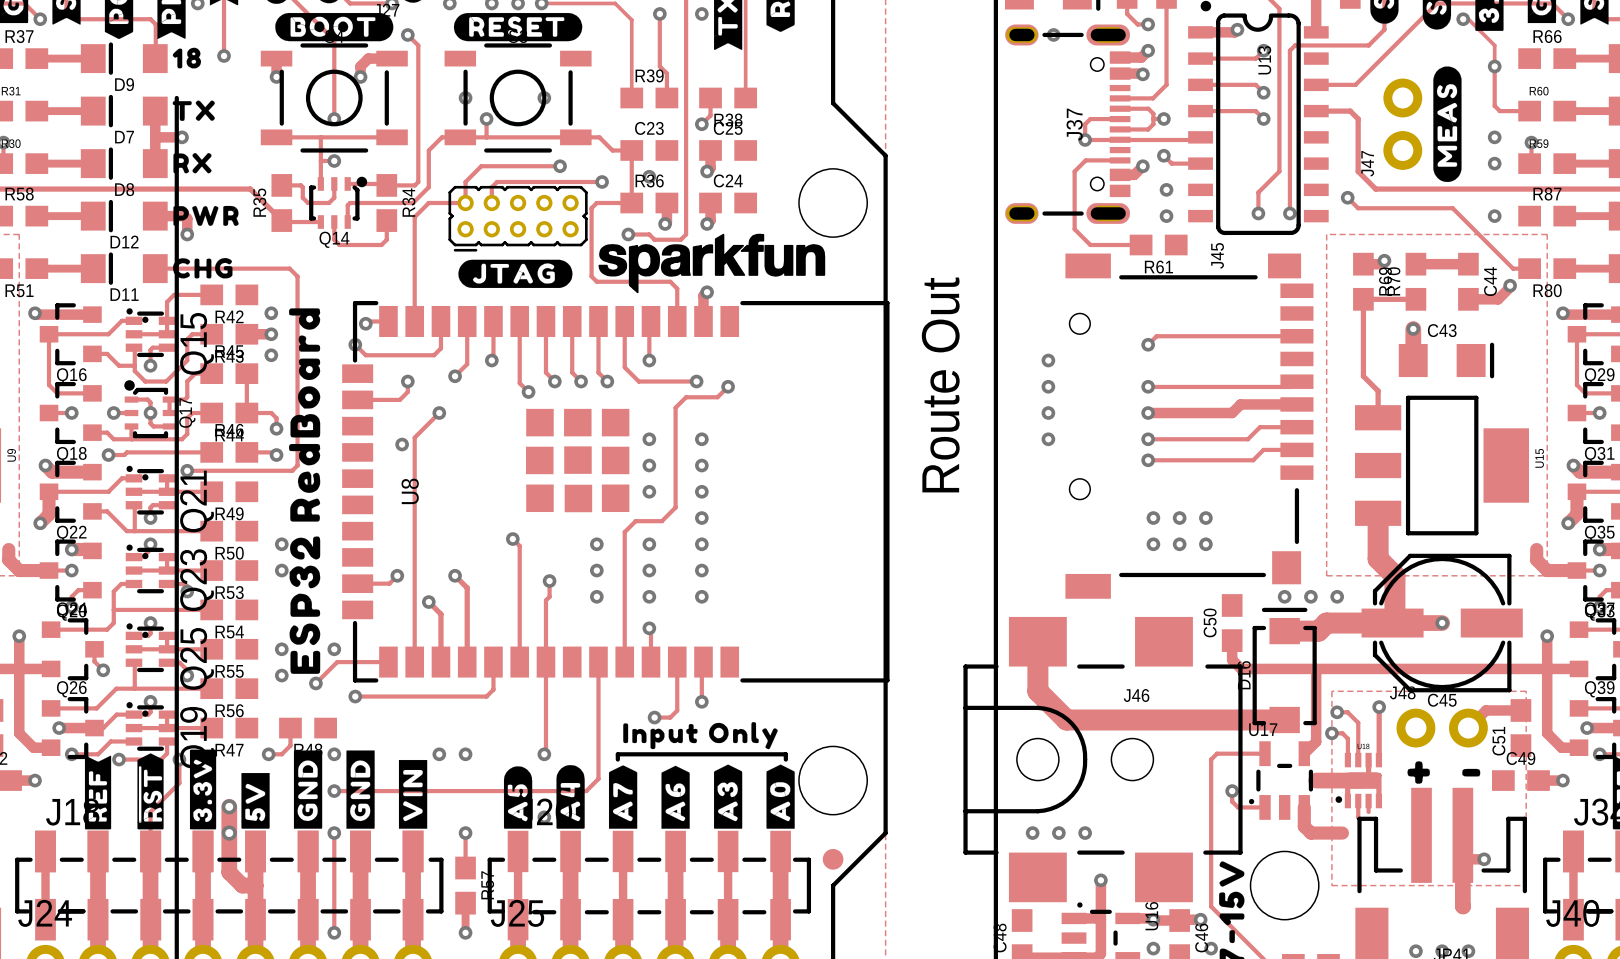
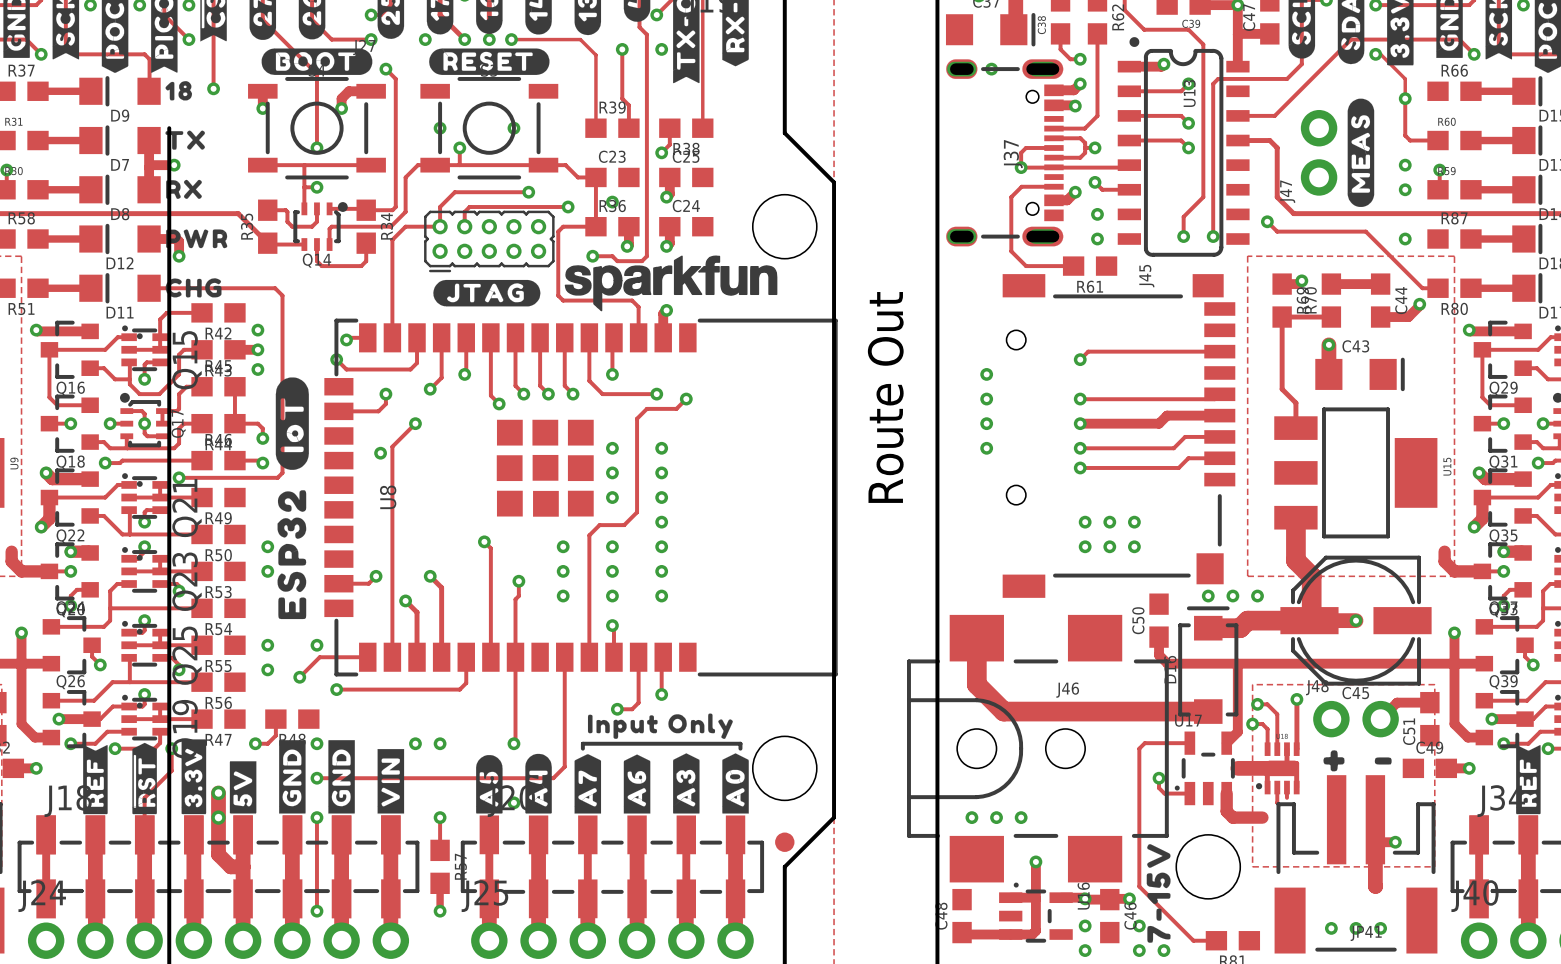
drawing shape: [289, 308, 321, 522] -> [275, 377, 309, 470]
drawing position: (304, 605) -> (291, 554)

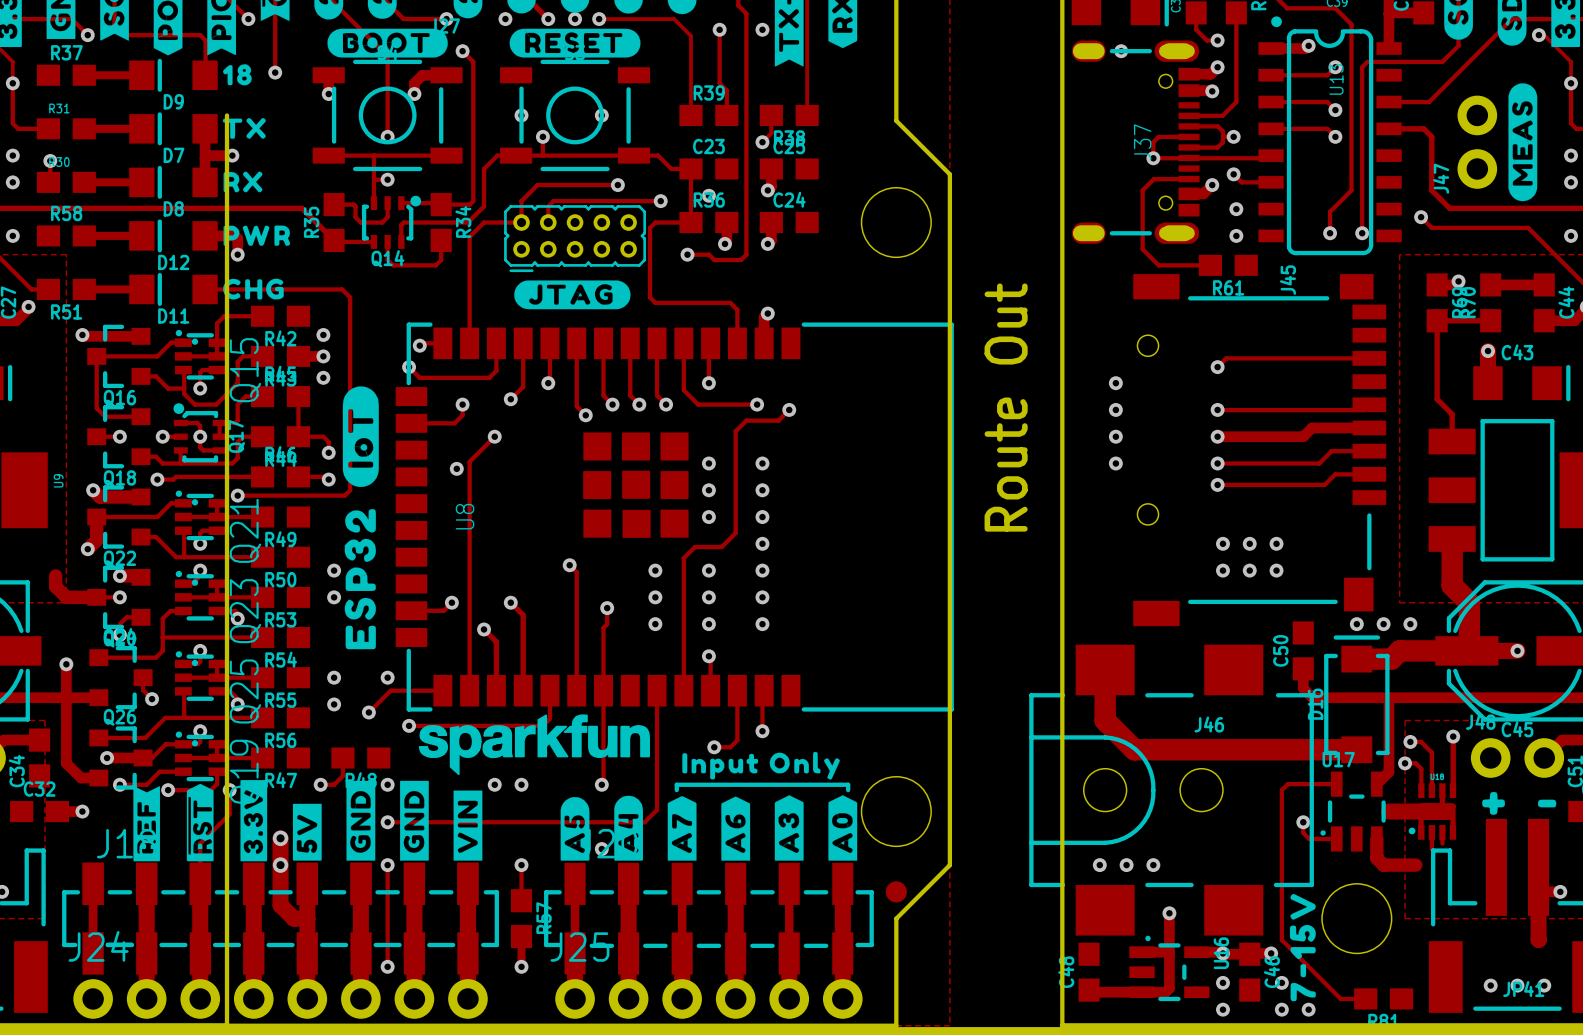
drawing position: (671, 283) -> (534, 744)

